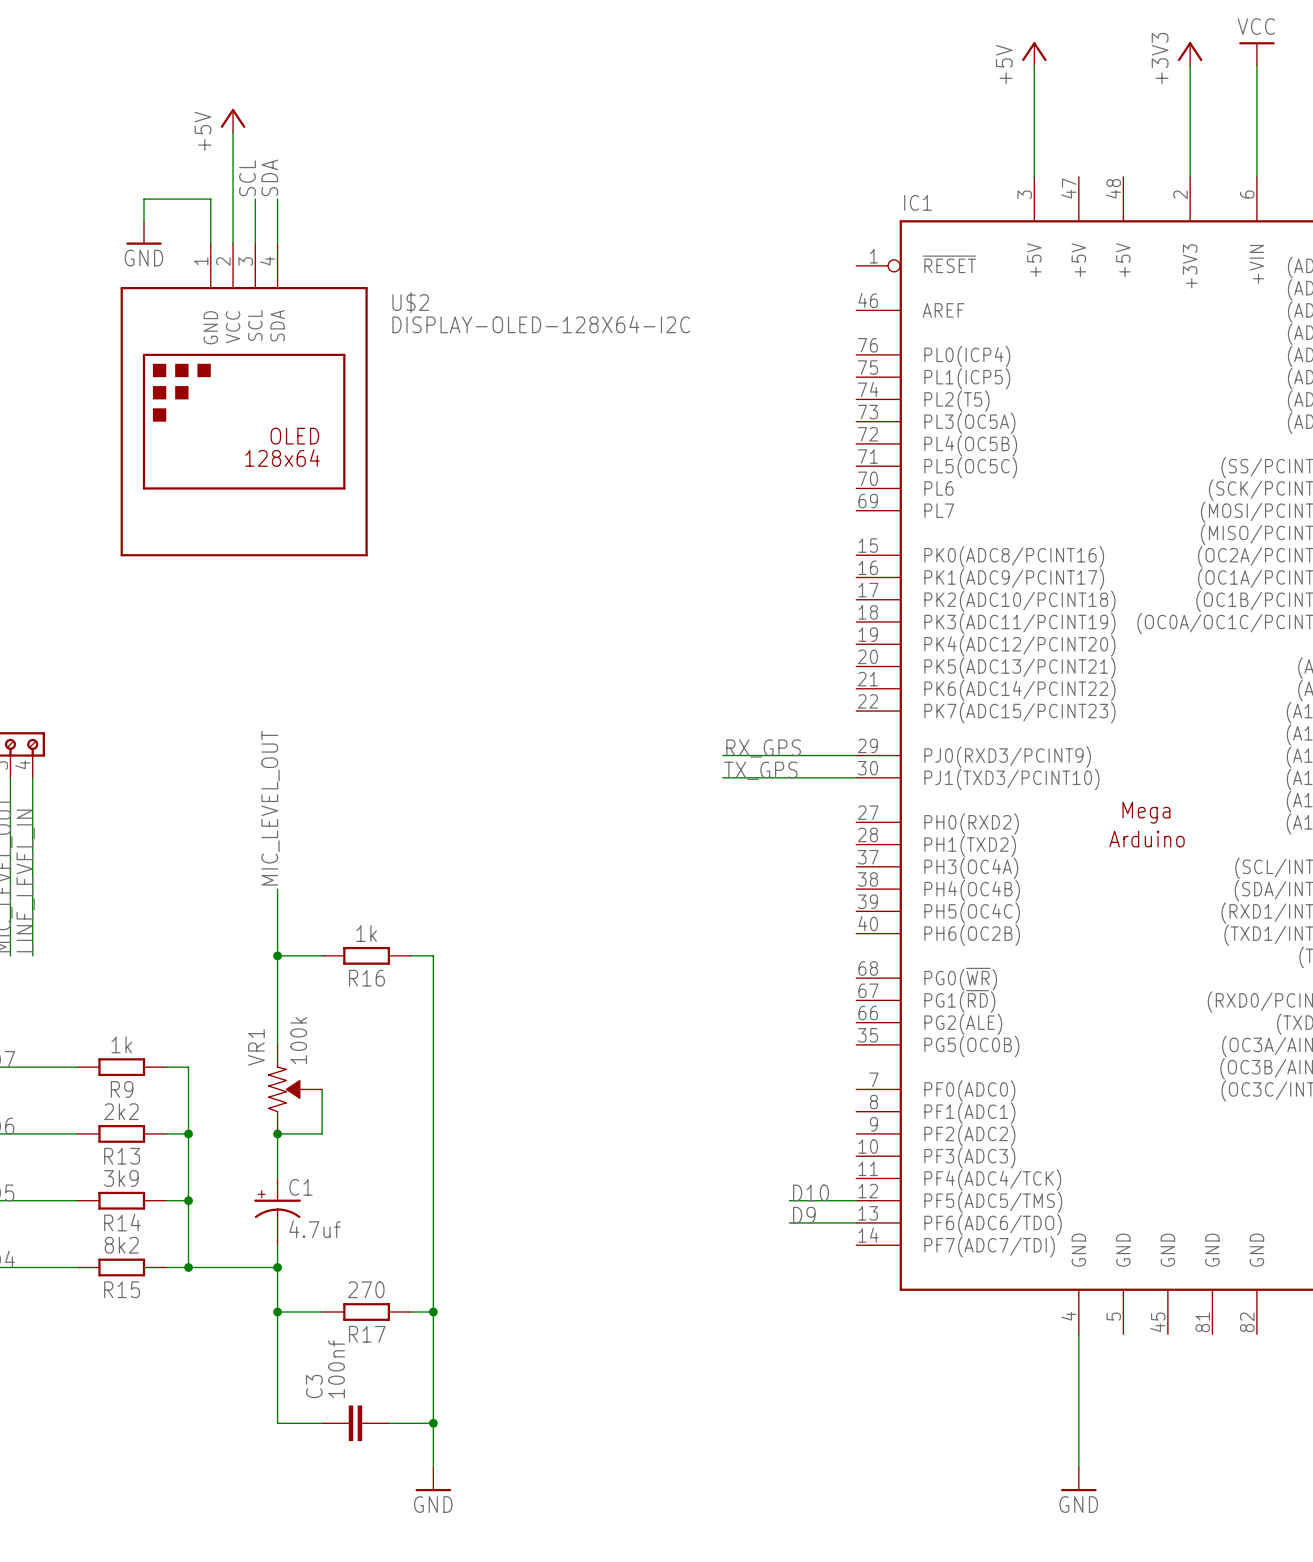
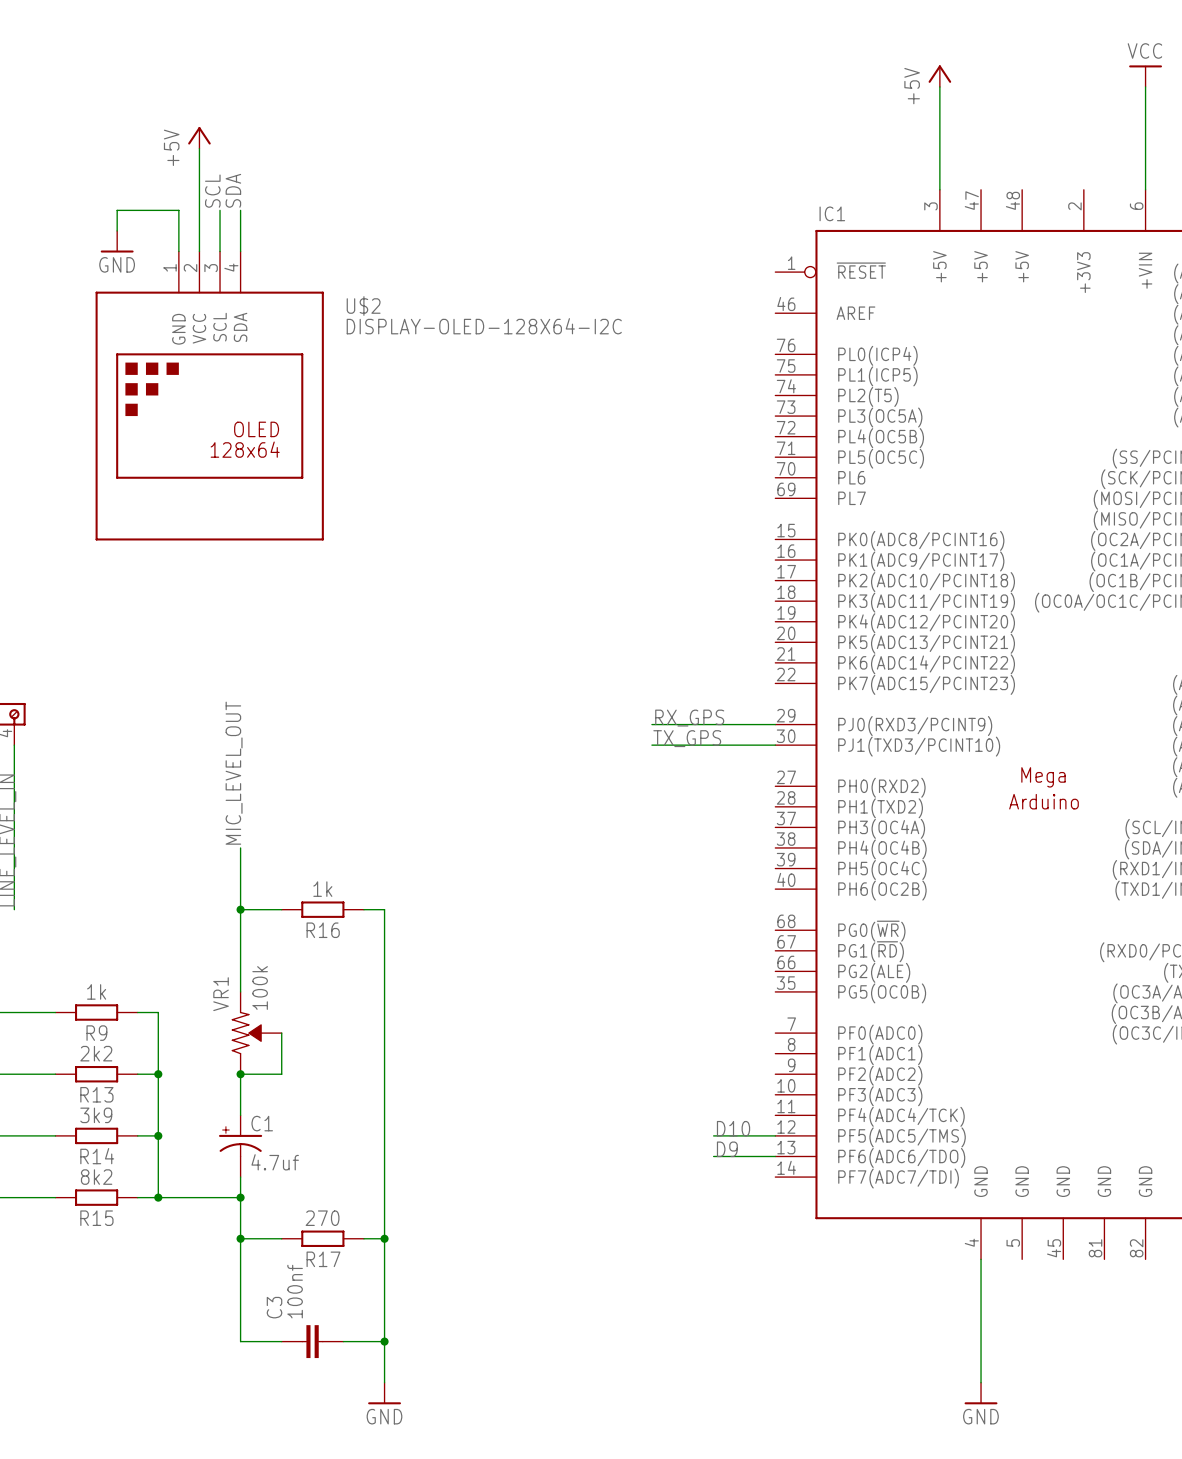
power symbol: +3V3 (1190, 53) -> none
wire: (1190, 65) (1190, 176) -> none

